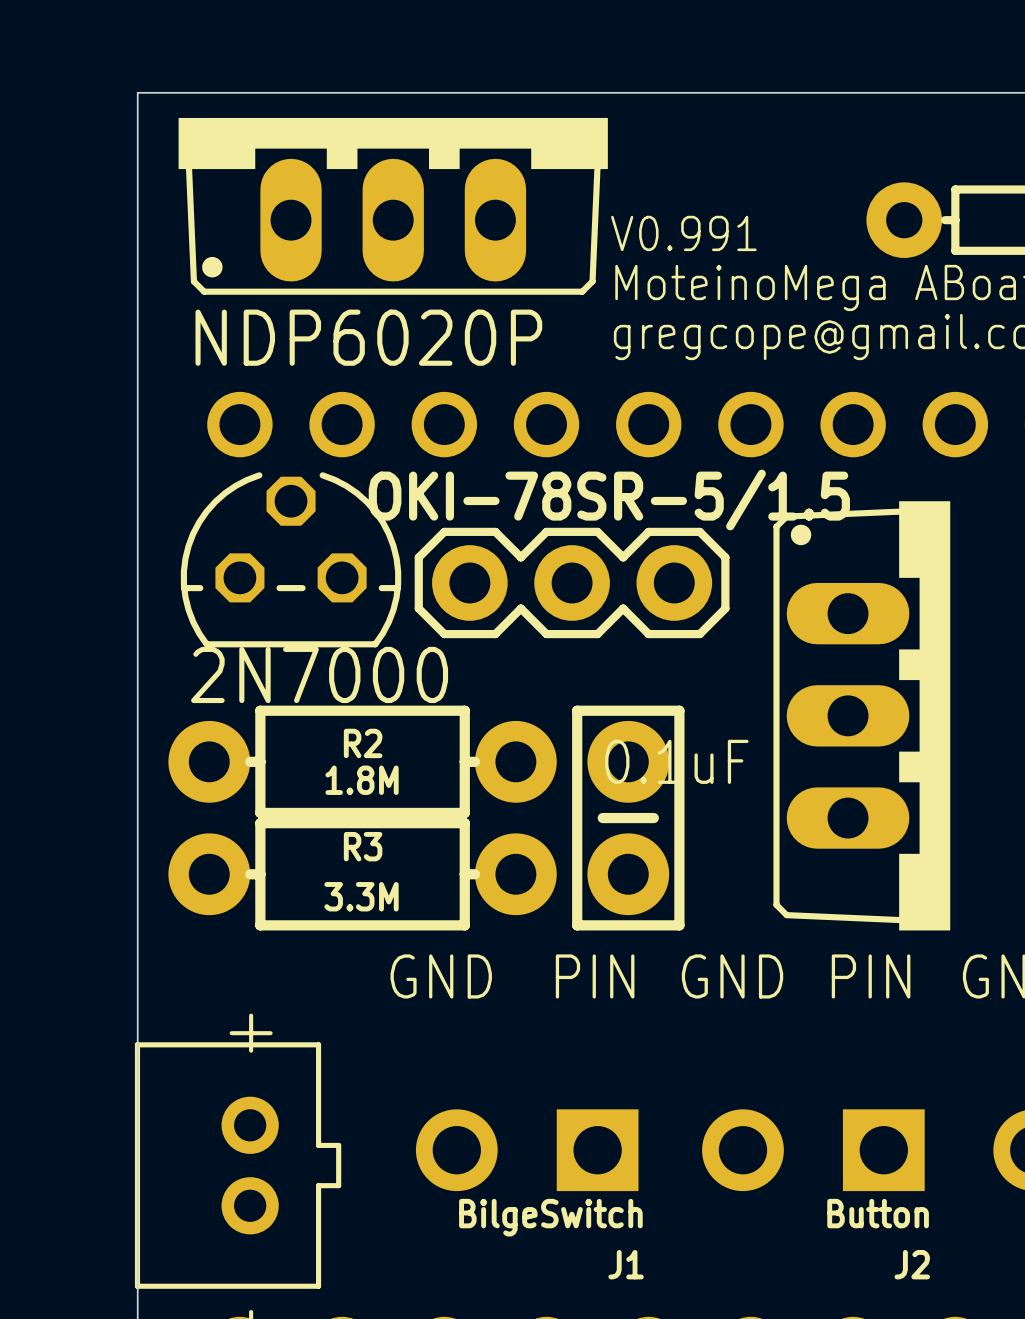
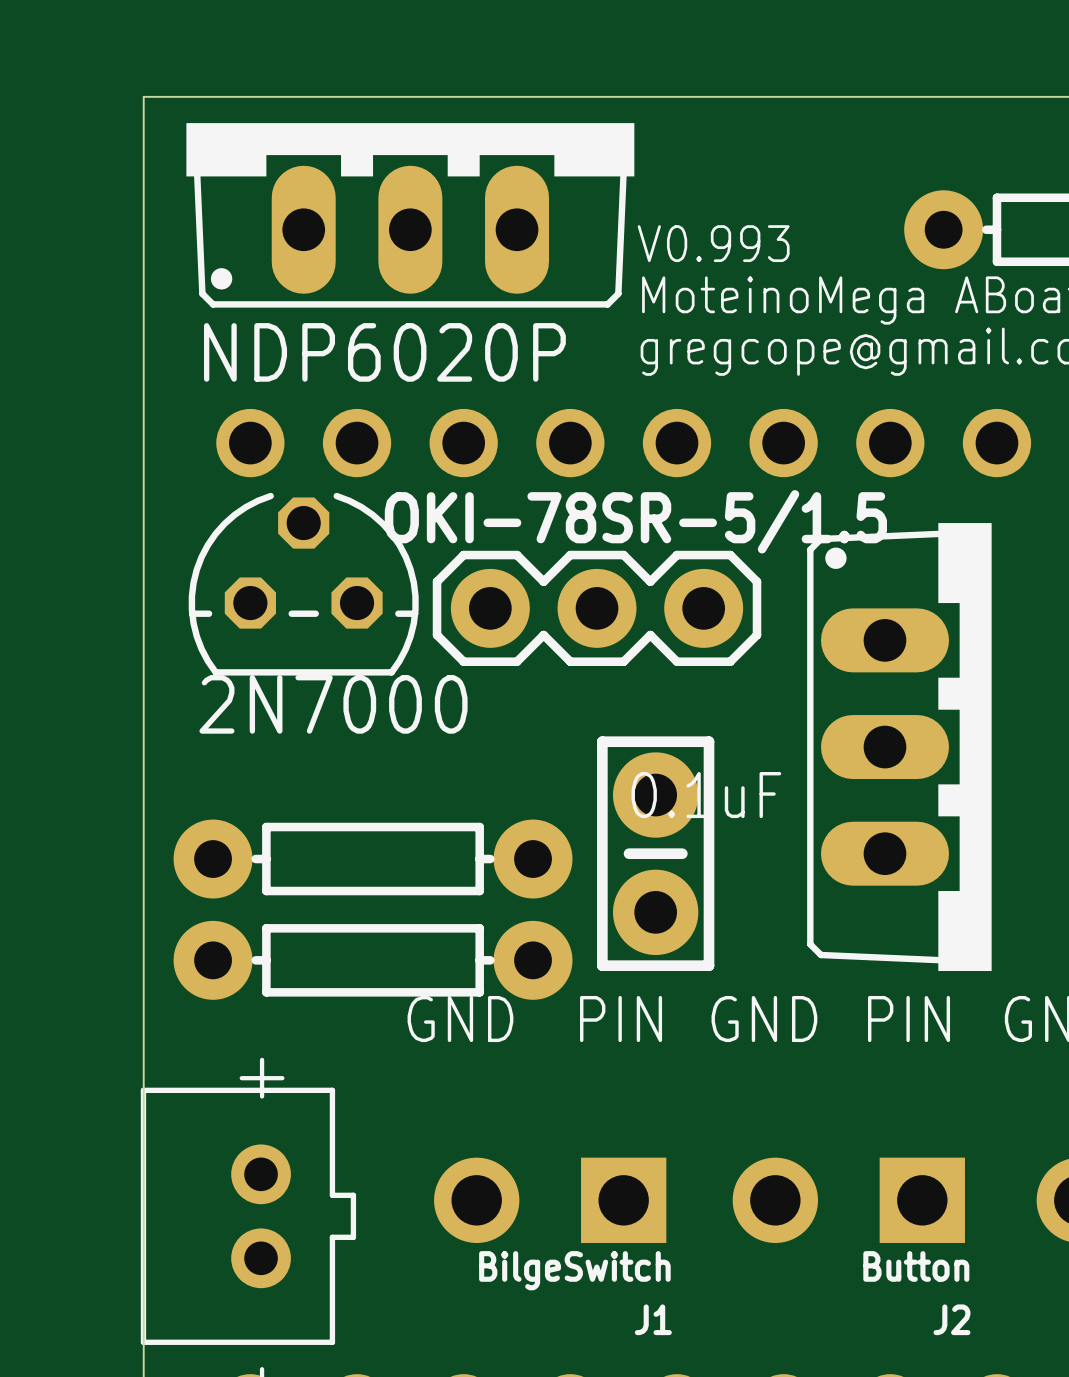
text: V0.991 (683, 233) -> V0.993 (713, 243)
R2: 1.8M (362, 761) -> none
part: none -> (373, 859)
R3: 3.3M (362, 874) -> none
part: none -> (373, 960)

